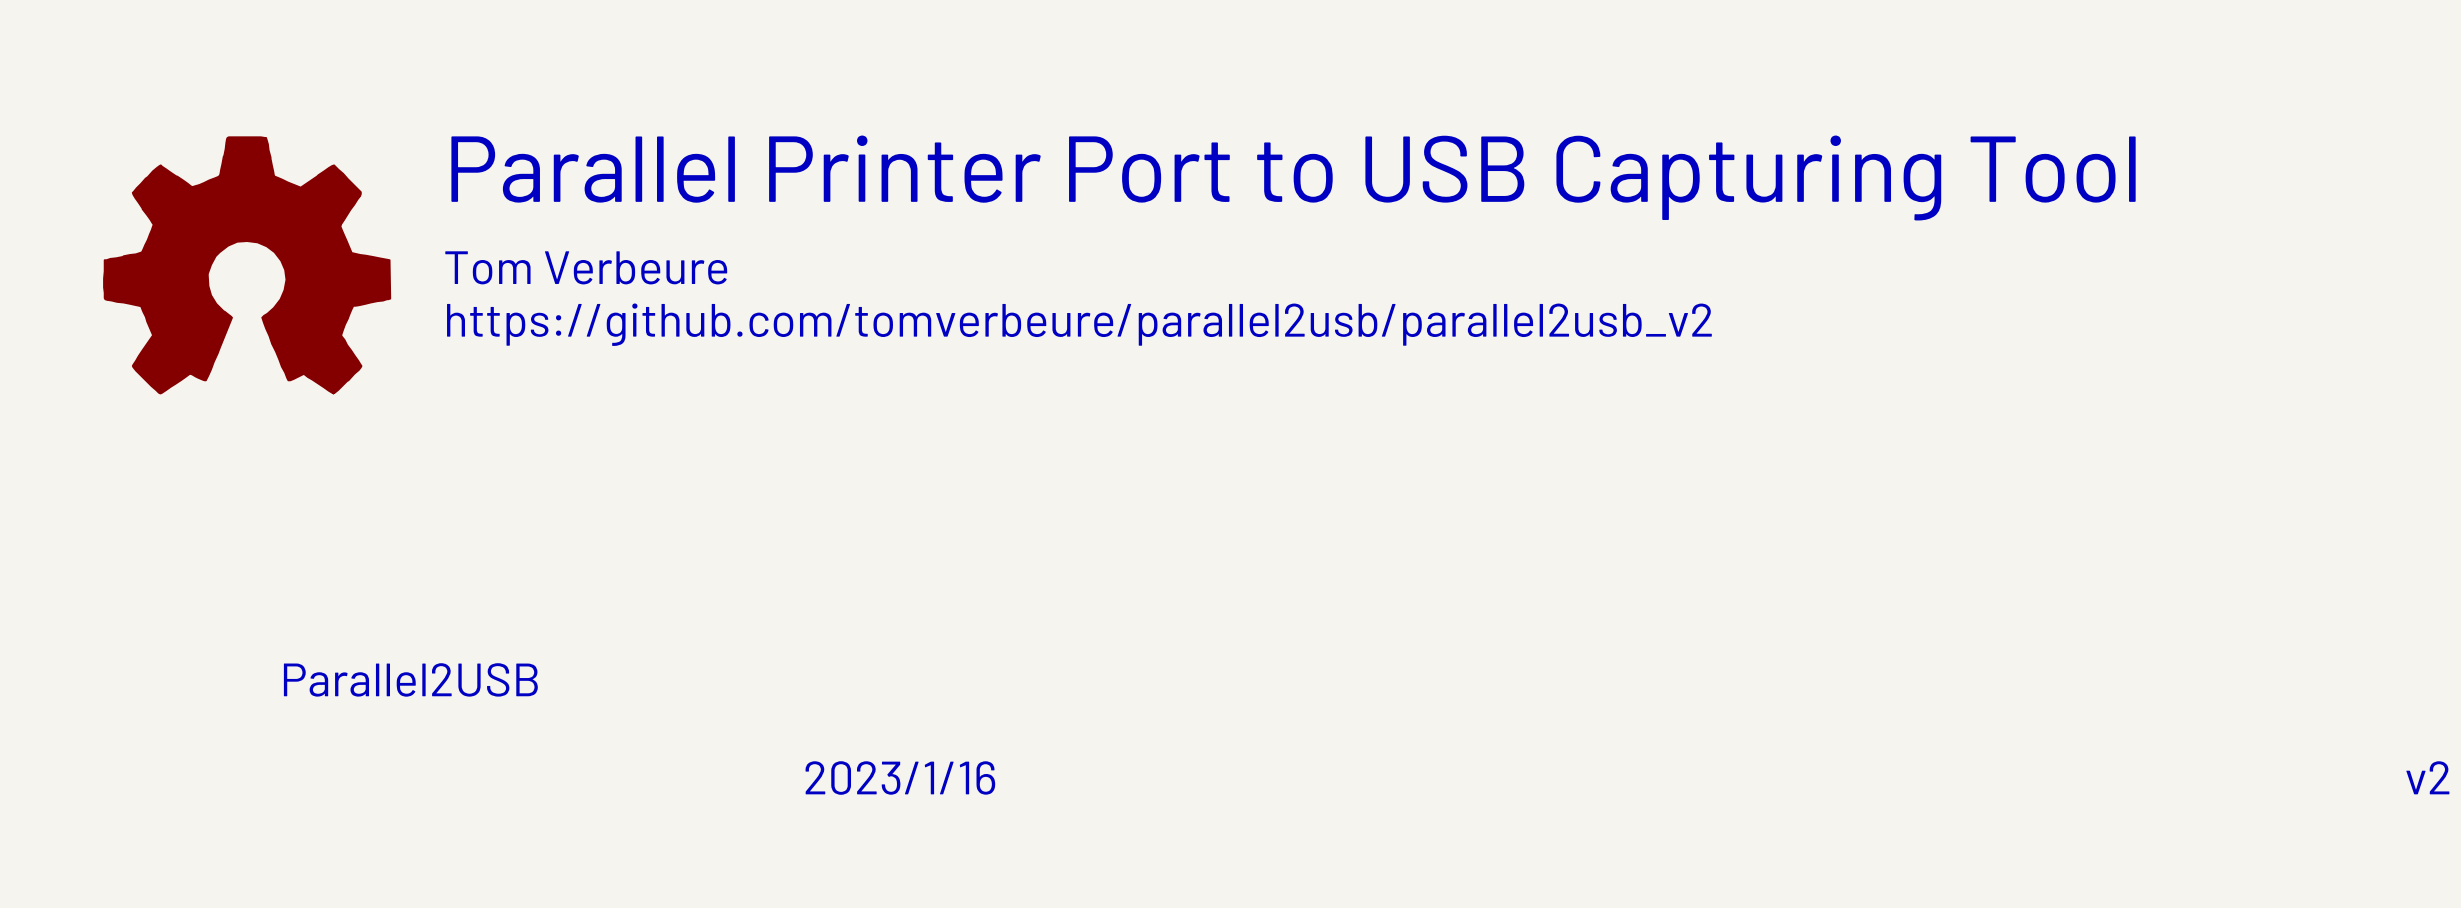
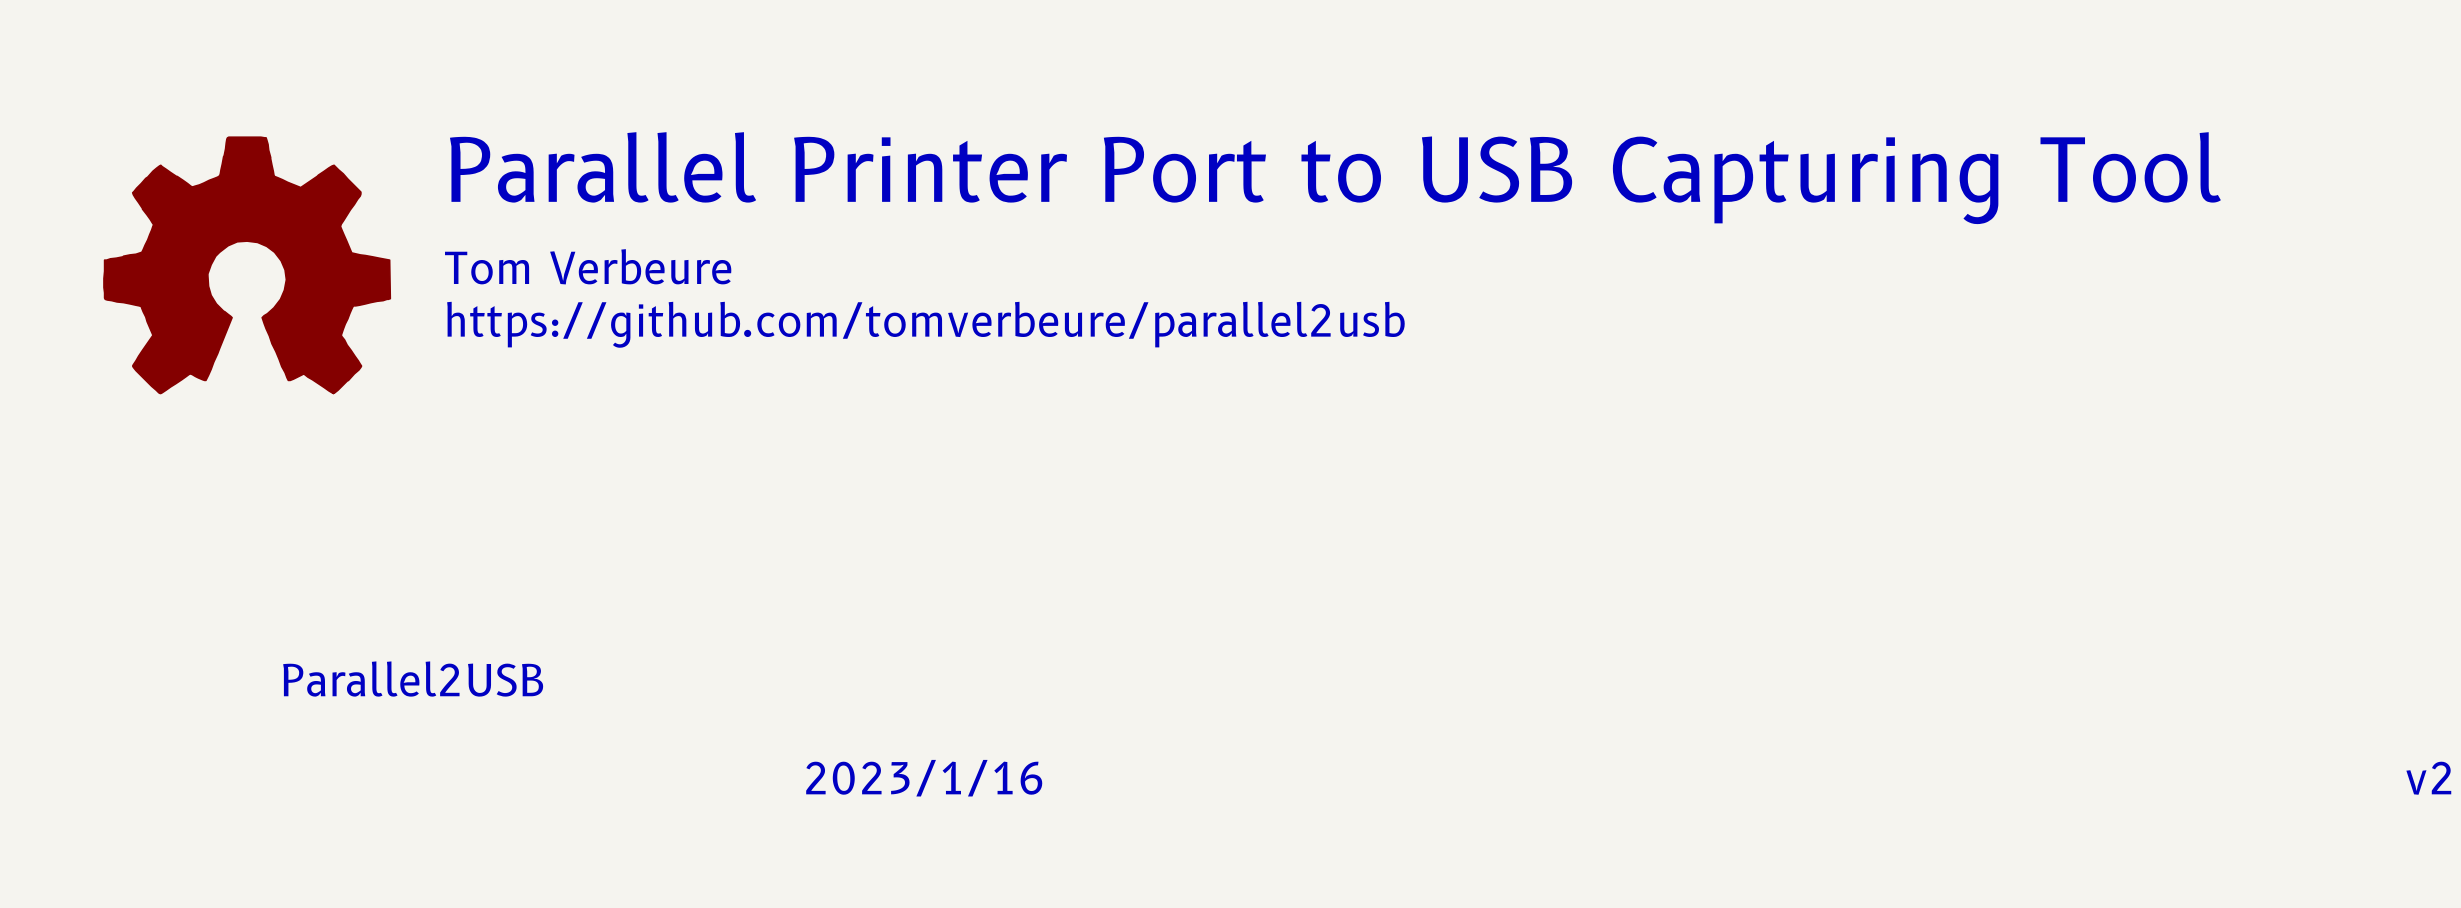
text: https://github.com/tomverbeure/parallel2usb/parallel2usb_v2 (1079, 324) -> https://github.com/tomverbeure/parallel2usb (925, 324)

